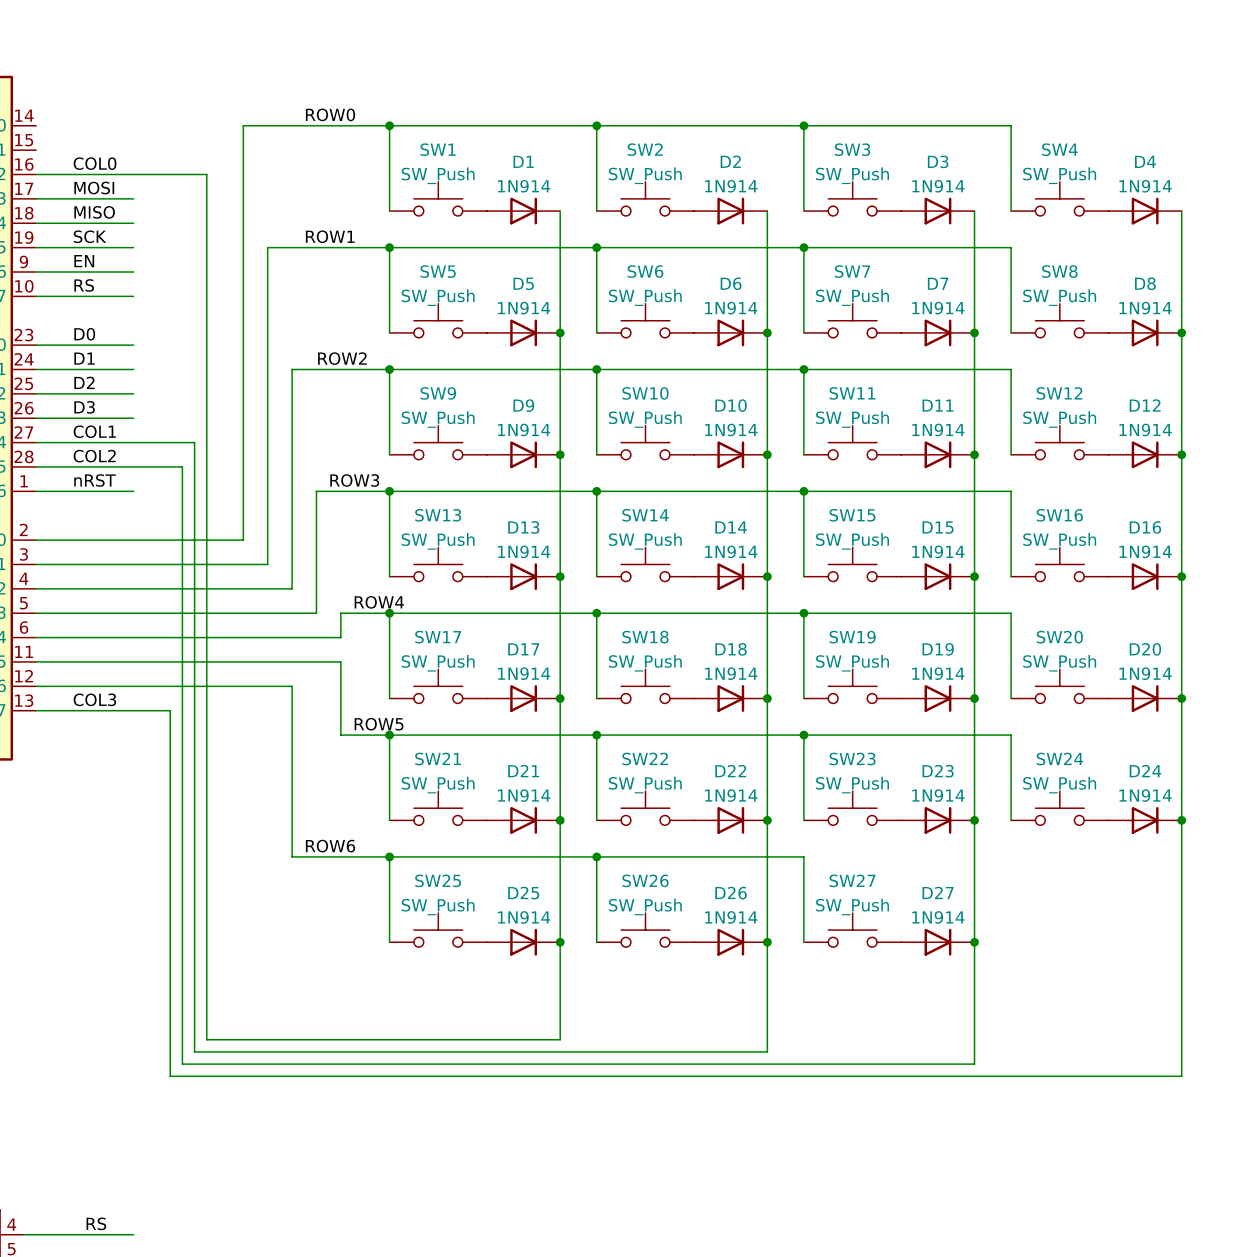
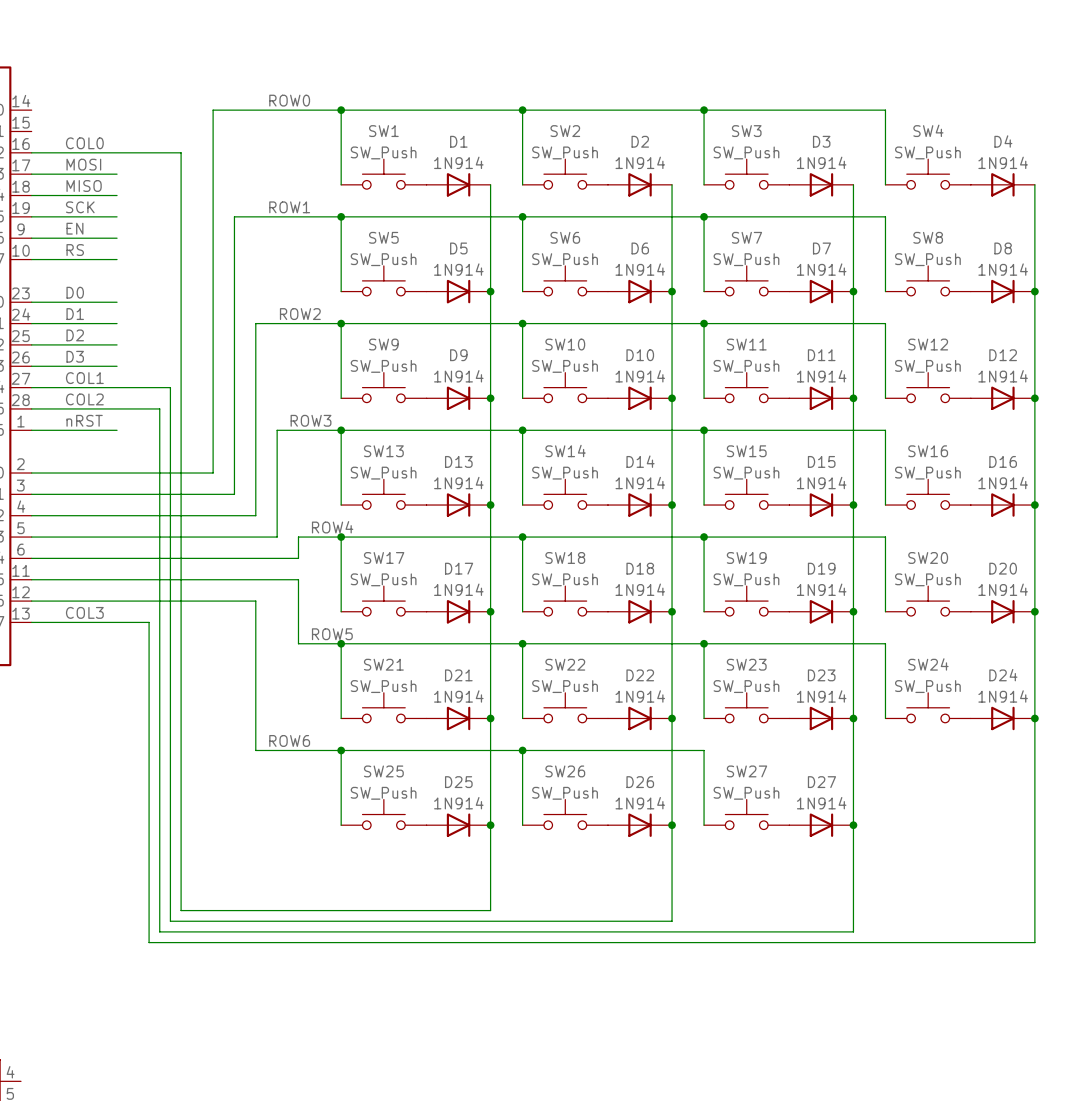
label: RS (96, 1223) -> none
wire: (23, 1234) (133, 1234) -> none

